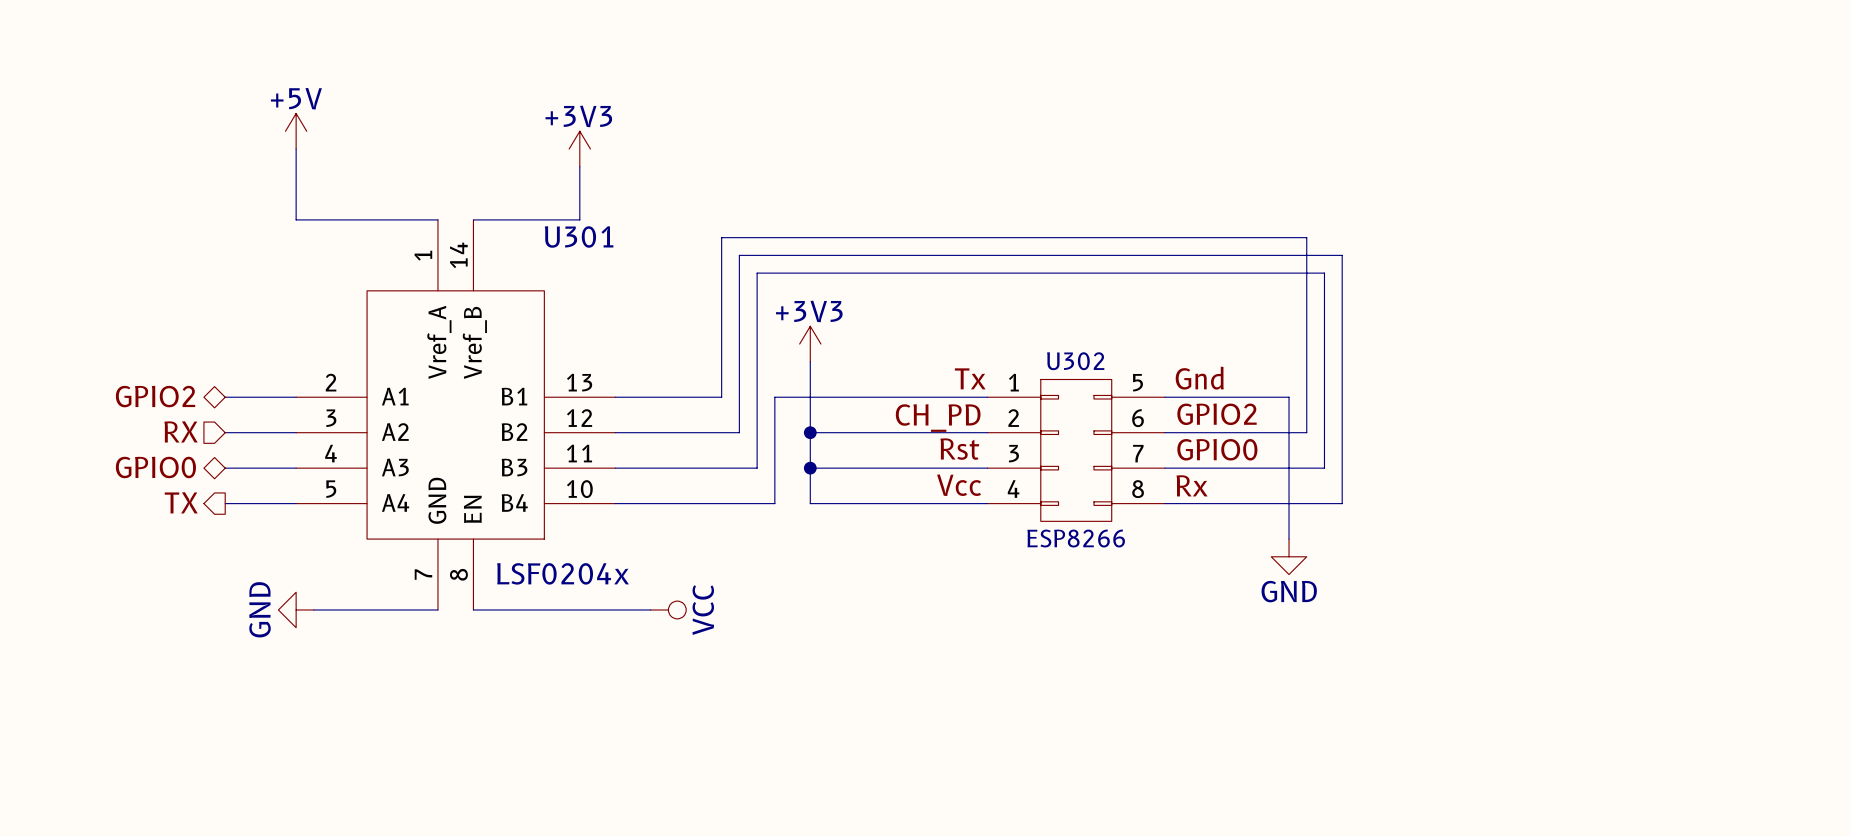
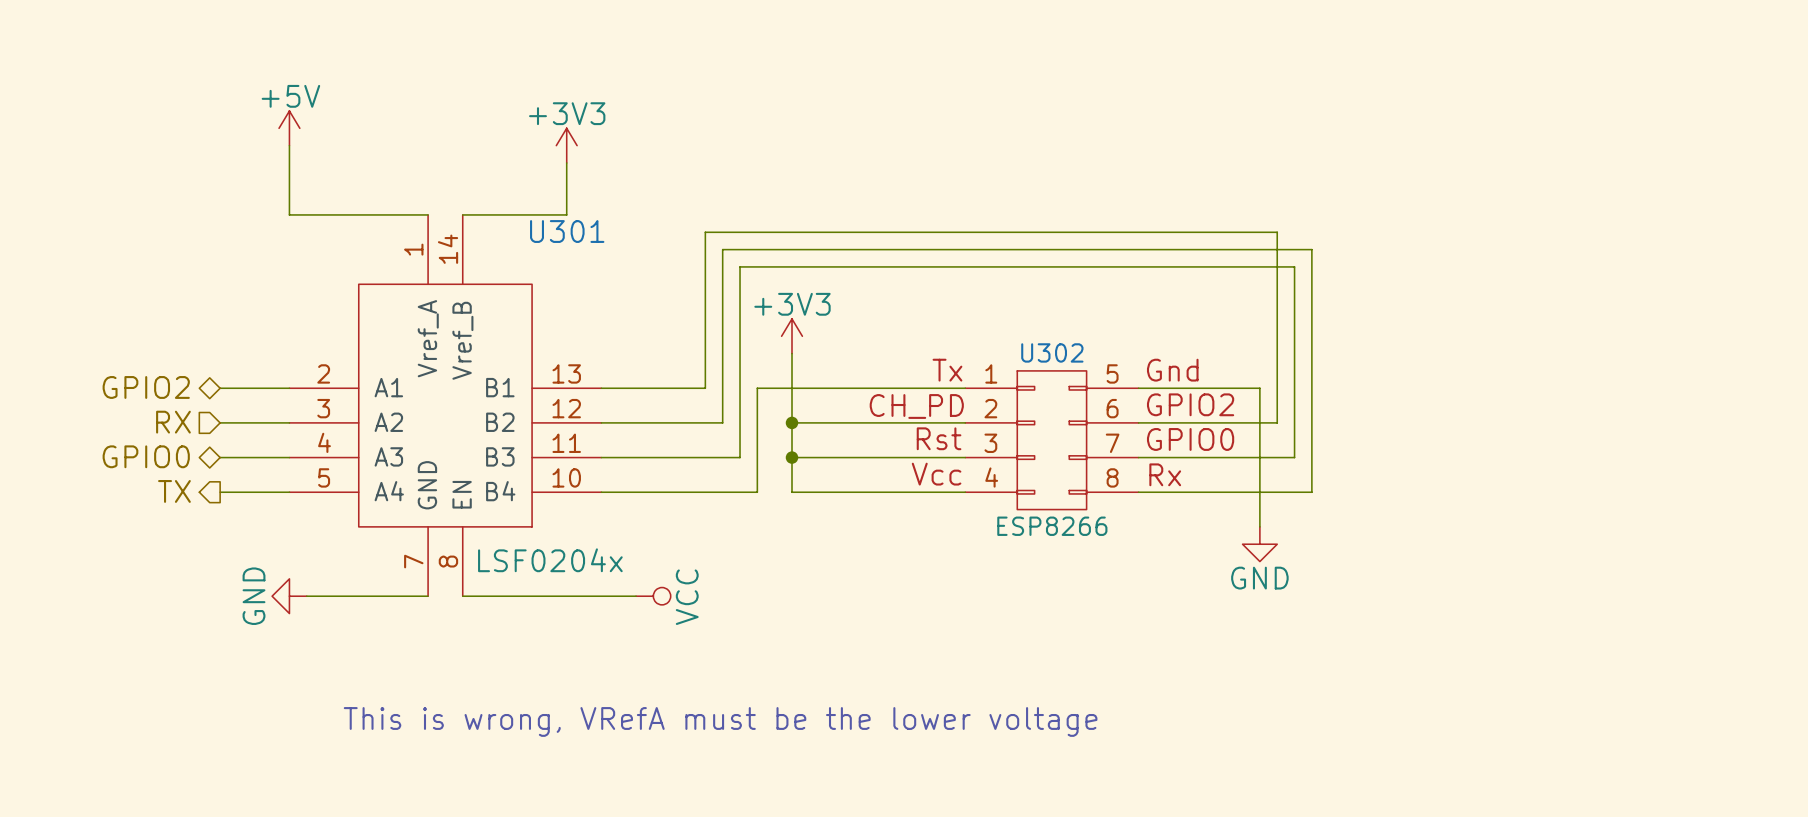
text: none -> This is wrong, VRefA must be the lower voltage (720, 721)

